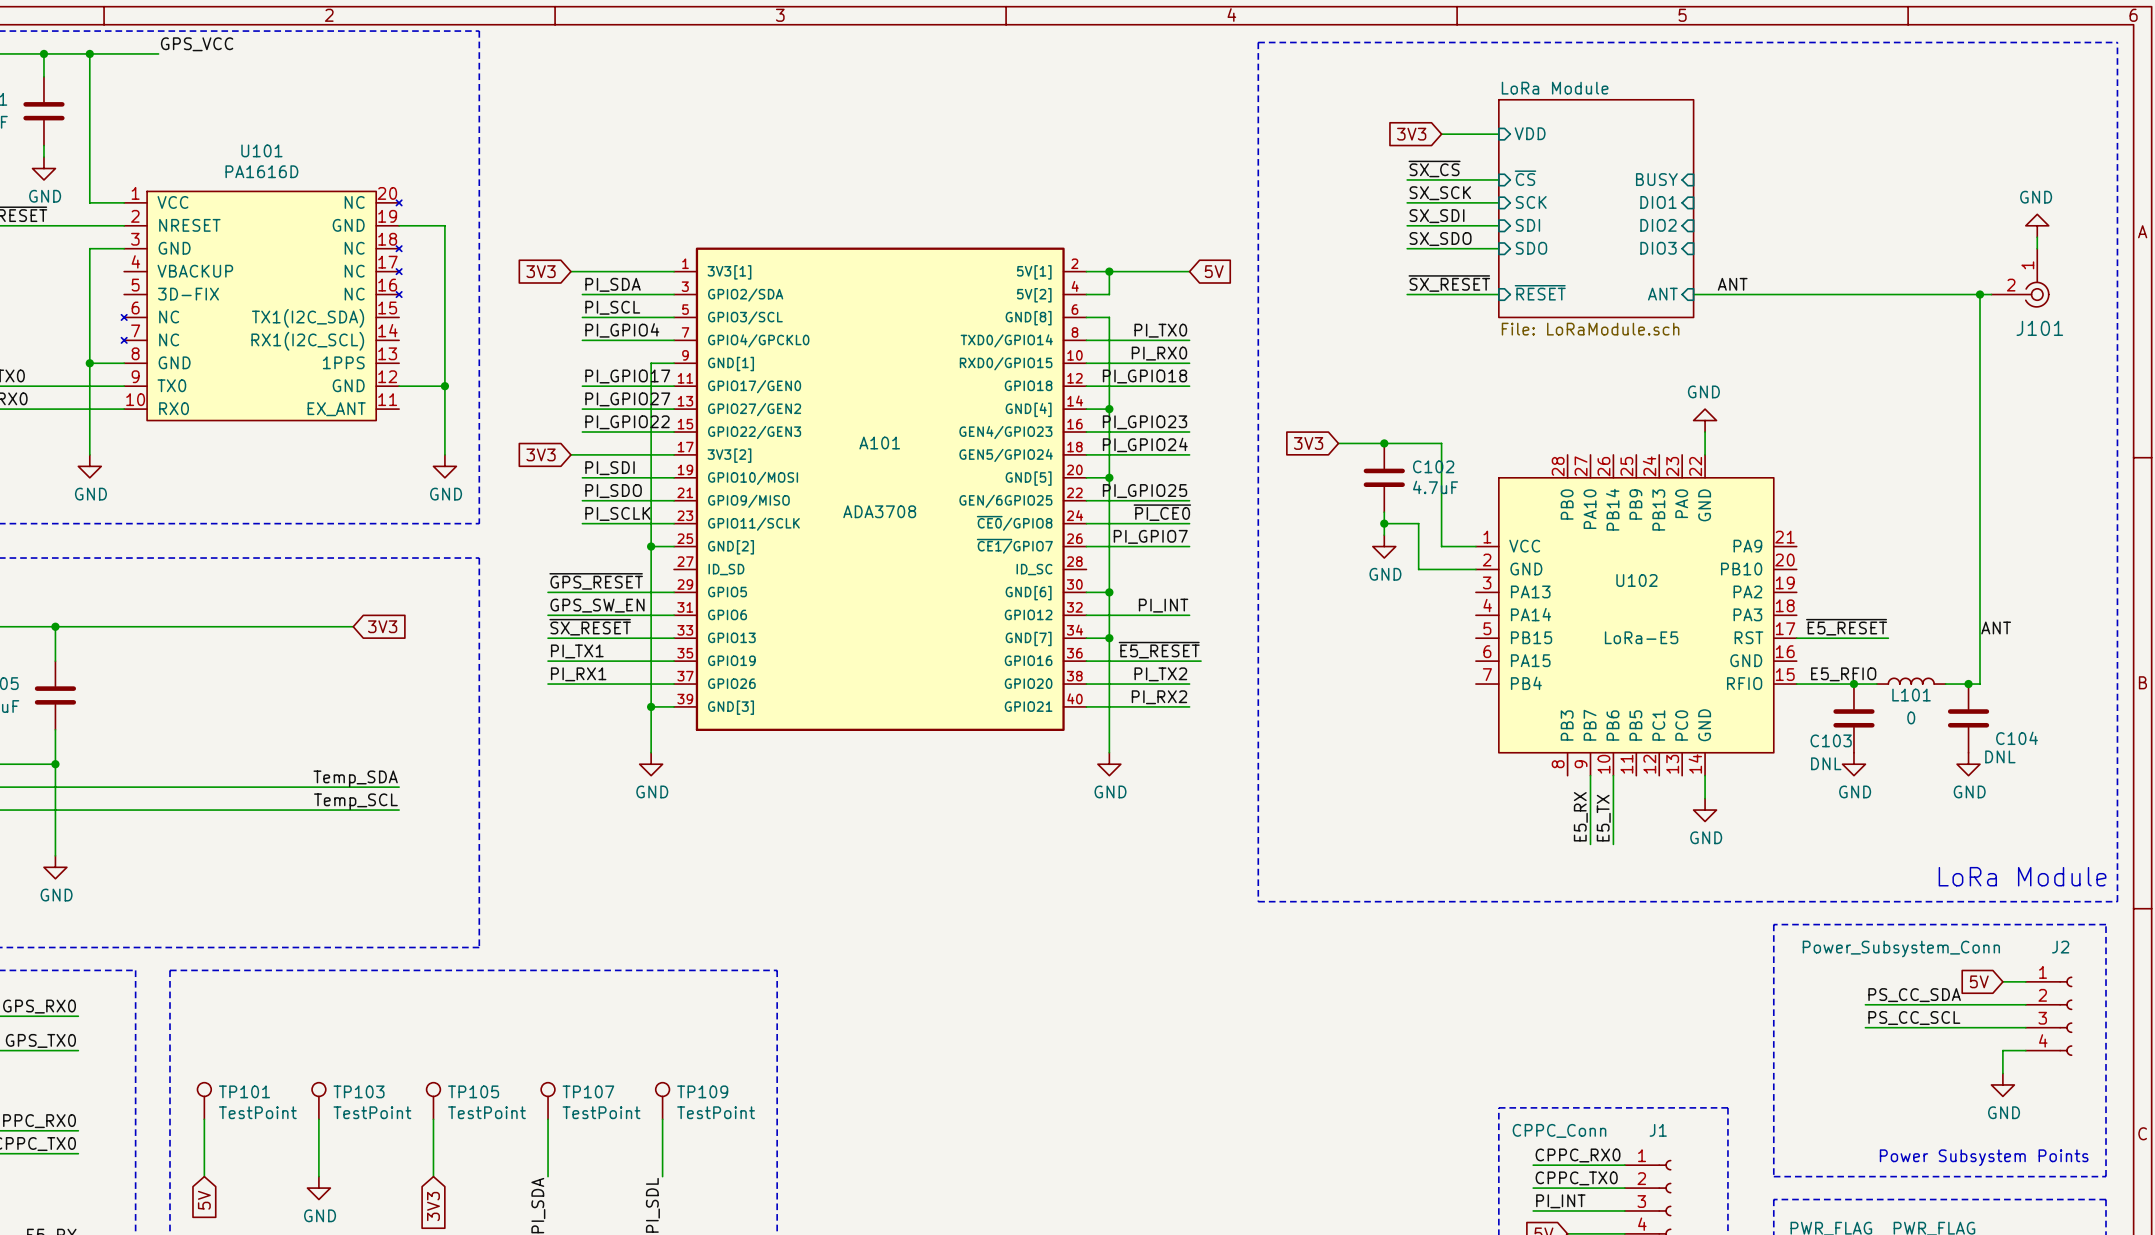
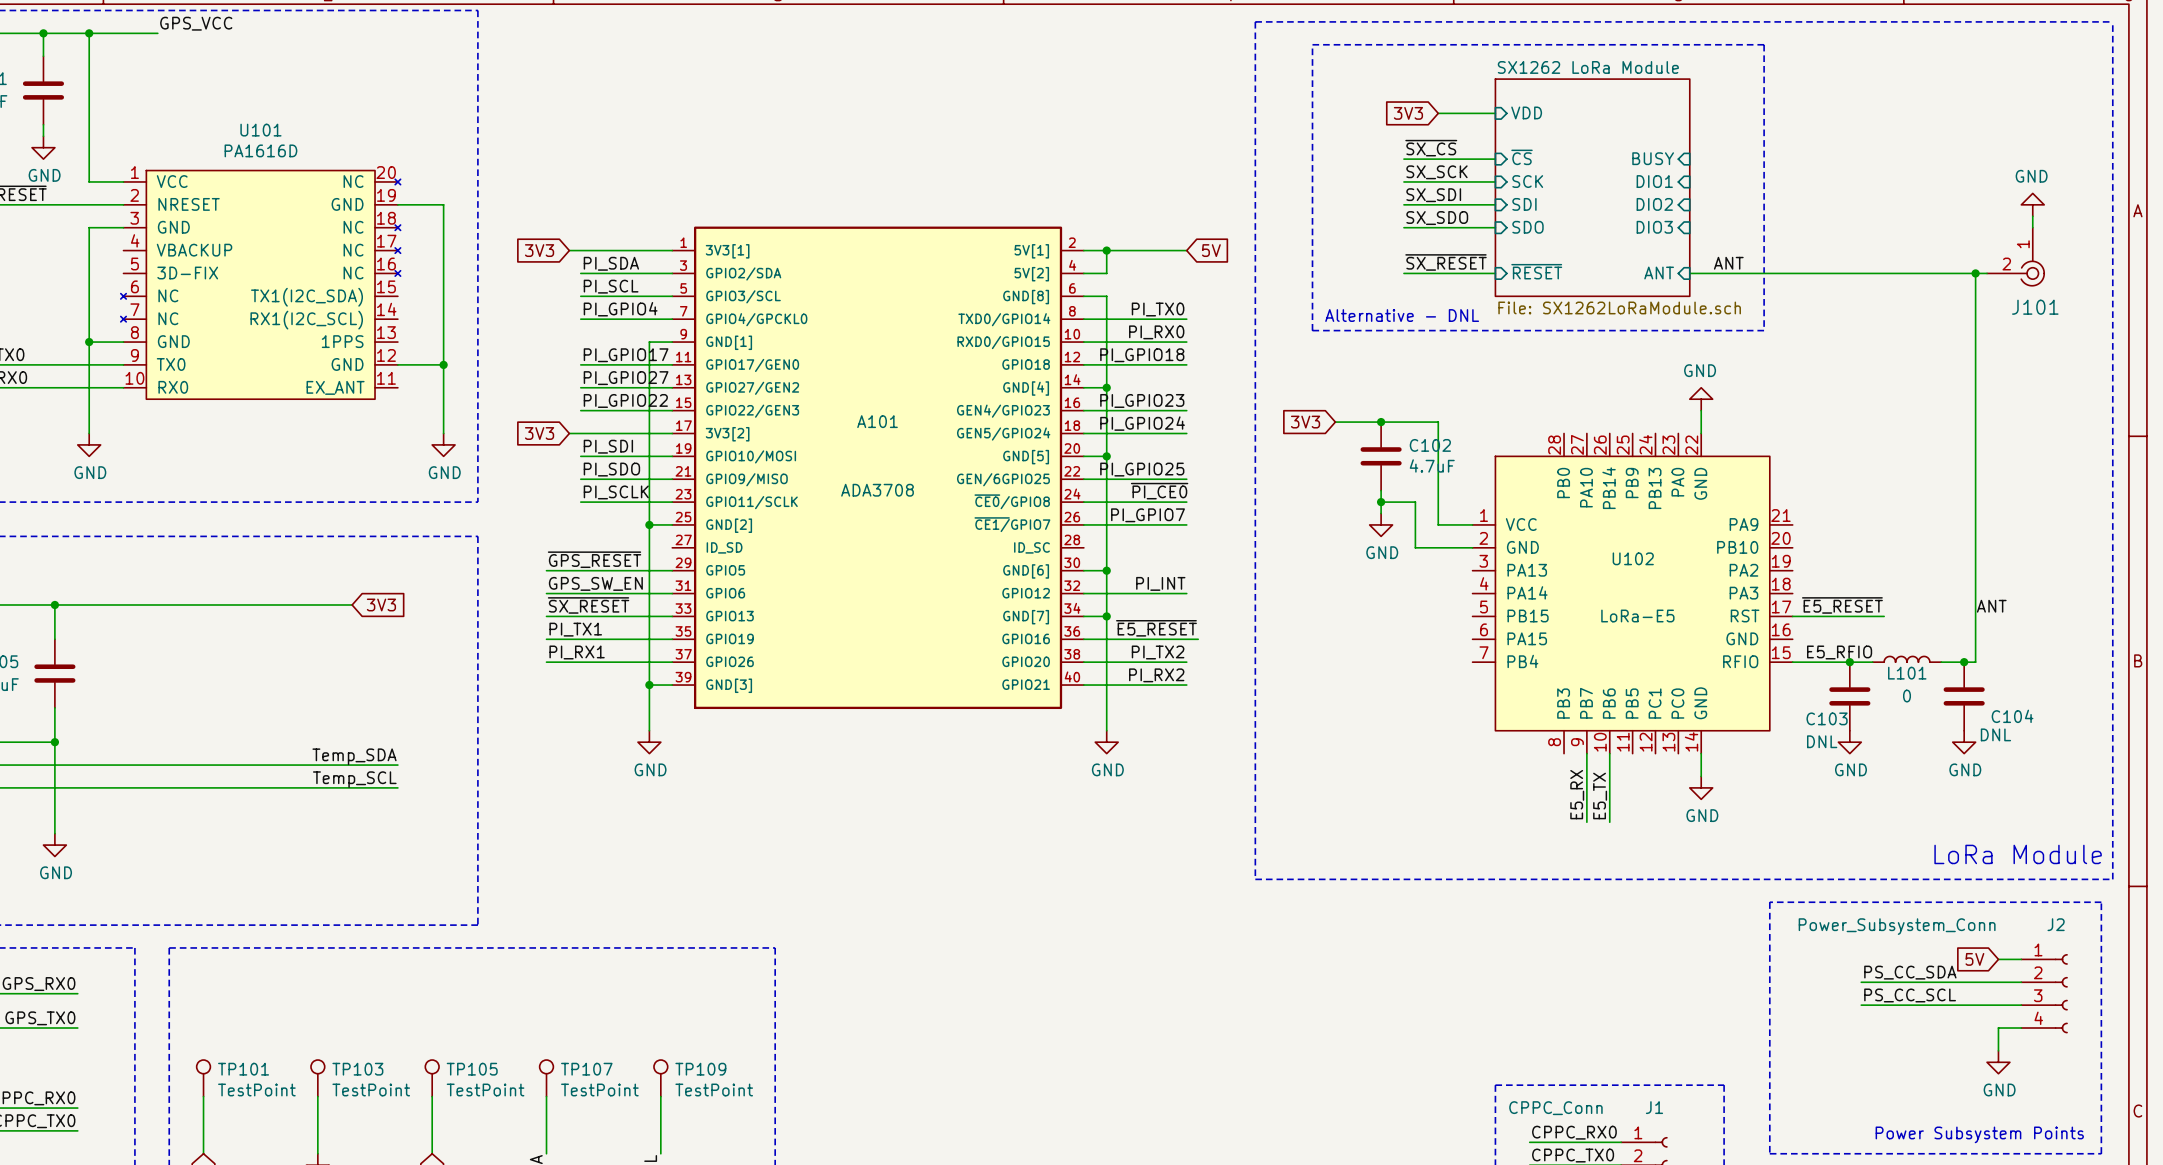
line: none -> (1312, 44) (1312, 330) (1764, 330) (1764, 44) (1312, 44)
sheet LoRa Module name: LoRa Module (1555, 88) -> SX1262 LoRa Module (1588, 67)
sheet LoRa Module value: File: LoRaModule.sch (1590, 329) -> File: SX1262LoRaModule.sch (1619, 307)
text: none -> Alternative - DNL (1402, 315)

